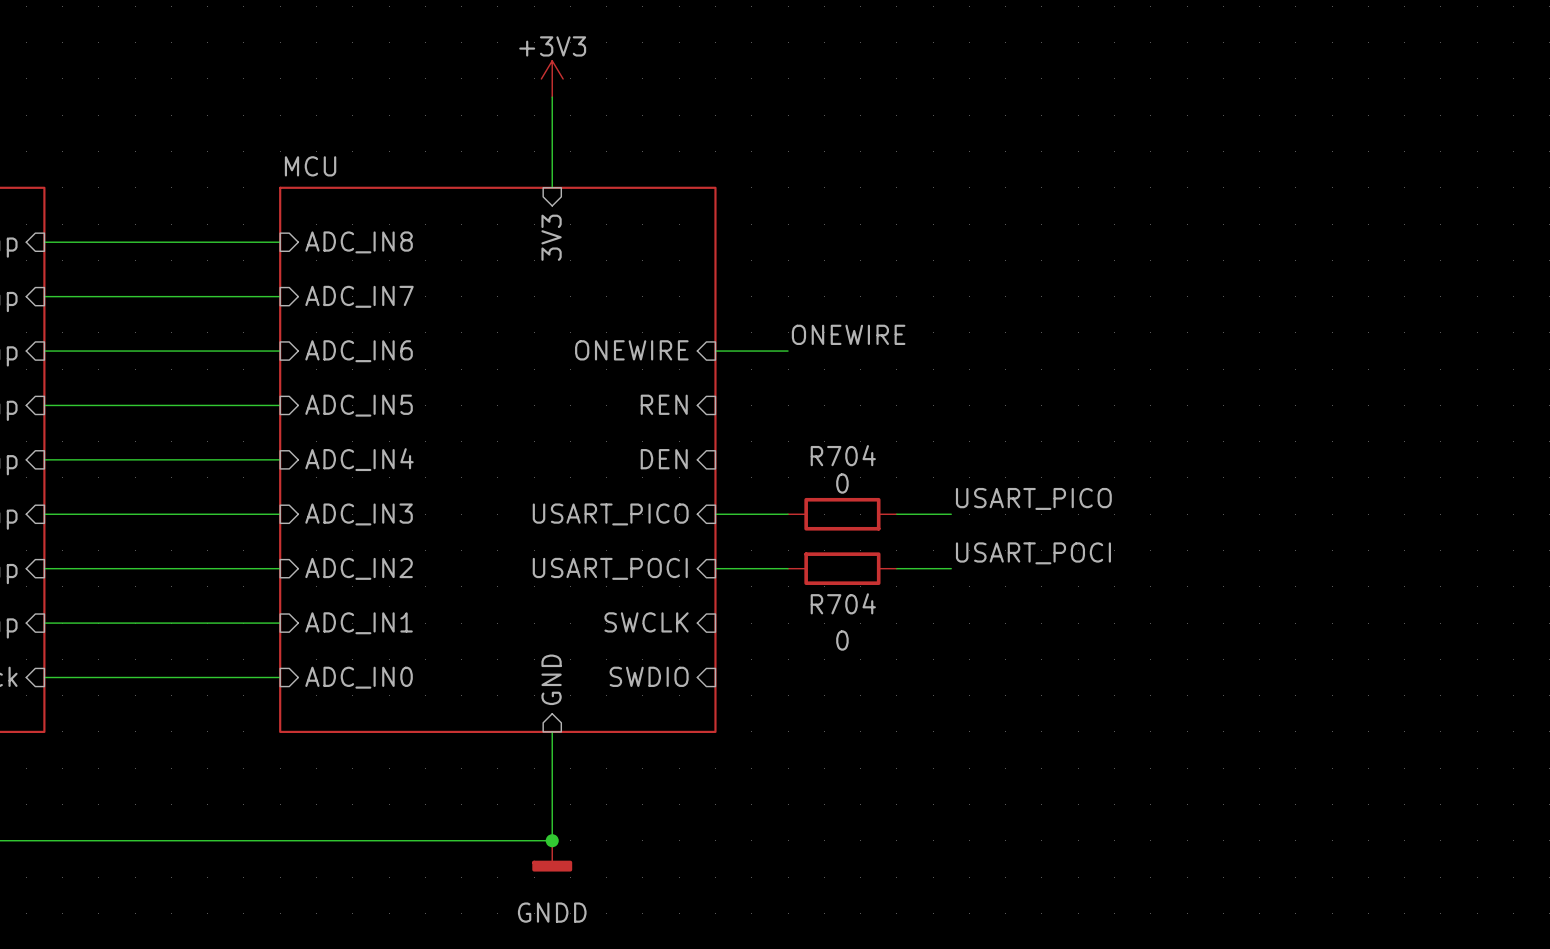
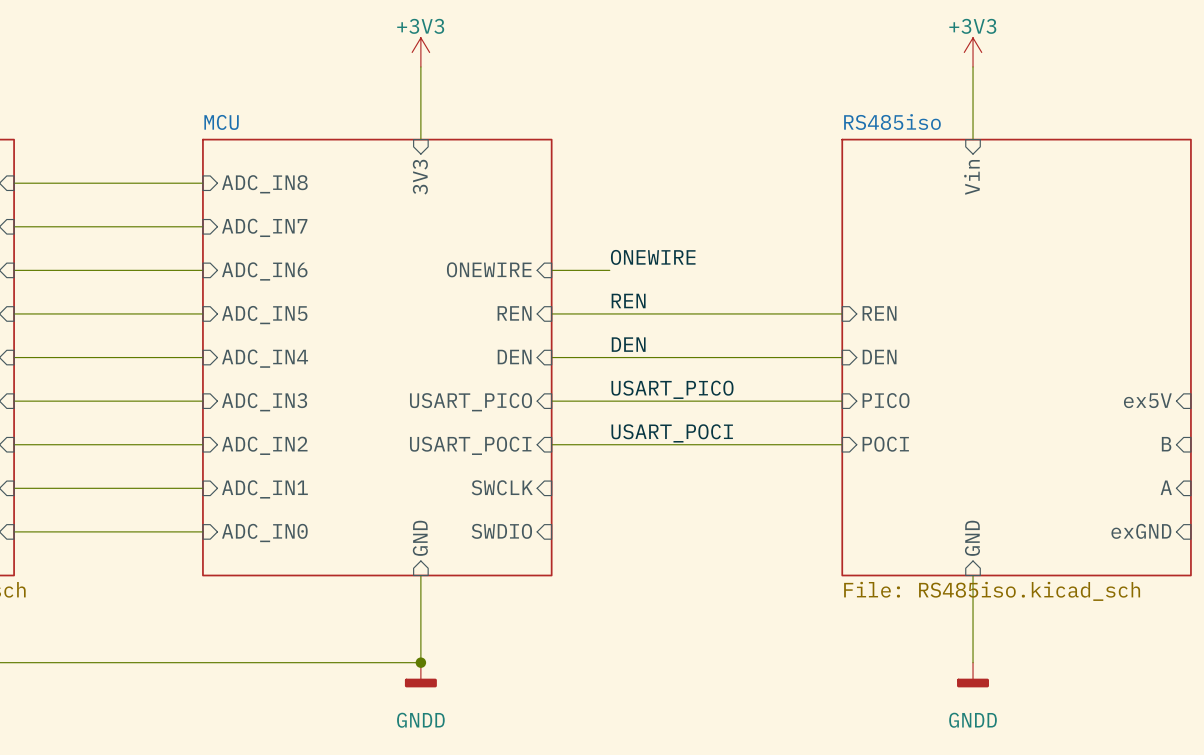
power symbol: none -> +3V3 (973, 52)
wire: none -> (973, 66) (973, 139)
sheet pin: none -> Vin (971, 177)
label: none -> REN (628, 301)
sheet pin: none -> REN (879, 313)
wire: none -> (551, 313) (842, 313)
label: none -> DEN (628, 344)
wire: none -> (551, 357) (842, 357)
sheet pin: none -> DEN (879, 357)
sheet RS485iso: none -> File: RS485iso.kicad_sch (1016, 357)
label position: USART_PICO (1033, 498) -> USART_PICO (672, 389)
sheet pin: none -> PICO (886, 400)
sheet pin: none -> ex5V (1147, 400)
wire: none -> (609, 401) (696, 401)
R704: 0 (842, 514) -> none
wire: none -> (740, 401) (842, 401)
label position: USART_POCI (1033, 553) -> USART_POCI (672, 433)
sheet pin: none -> POCI (885, 444)
sheet pin: none -> B (1166, 444)
wire: none -> (609, 444) (696, 444)
R704: 0 (842, 568) -> none
wire: none -> (740, 444) (842, 444)
sheet pin: none -> A (1166, 487)
sheet pin: none -> exGND (1141, 531)
sheet pin: none -> GND (972, 538)
wire: none -> (973, 575) (973, 662)
power symbol: none -> GNDD (973, 675)

